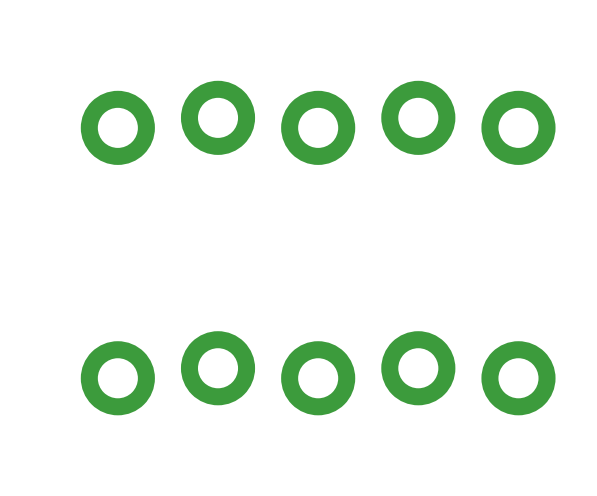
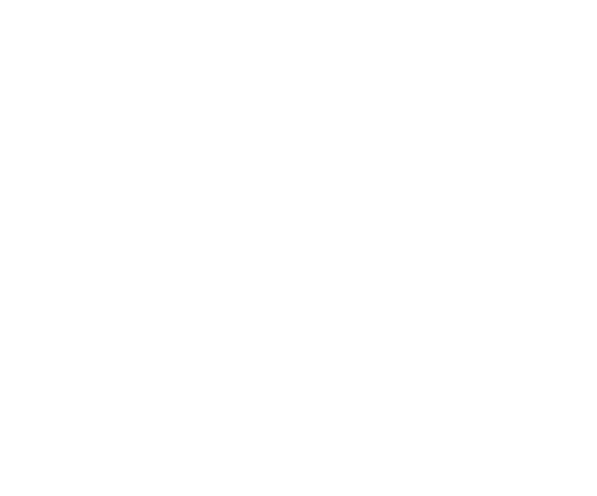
part: (318, 122) -> none
part: (318, 373) -> none

